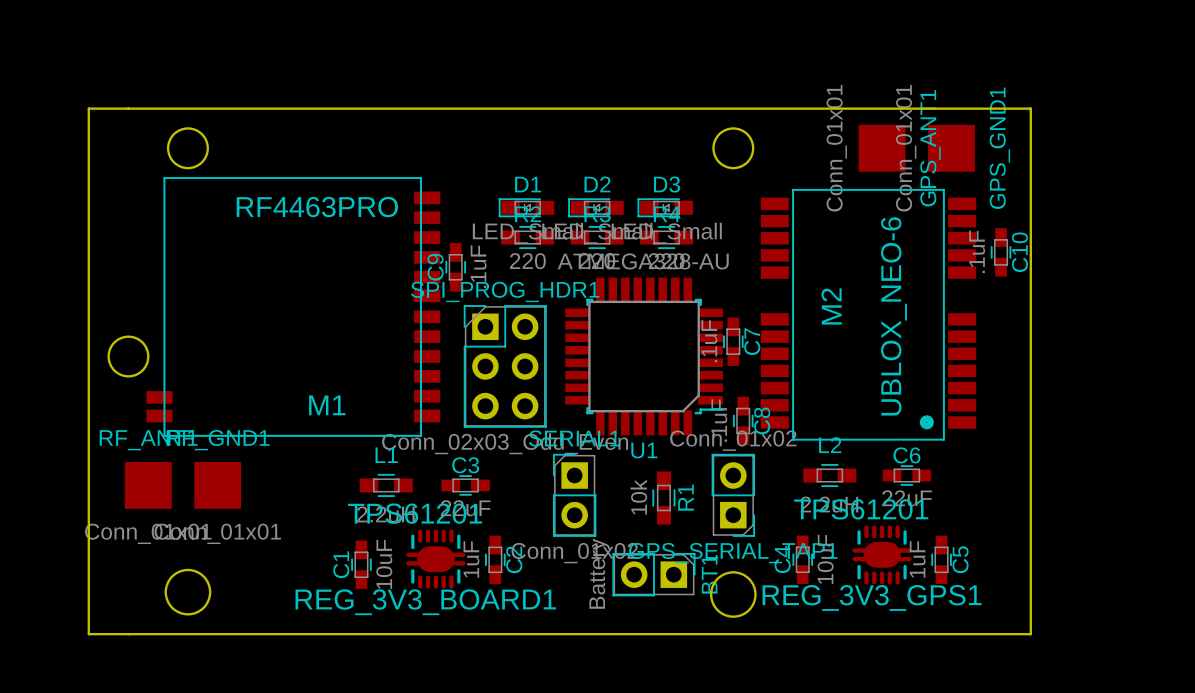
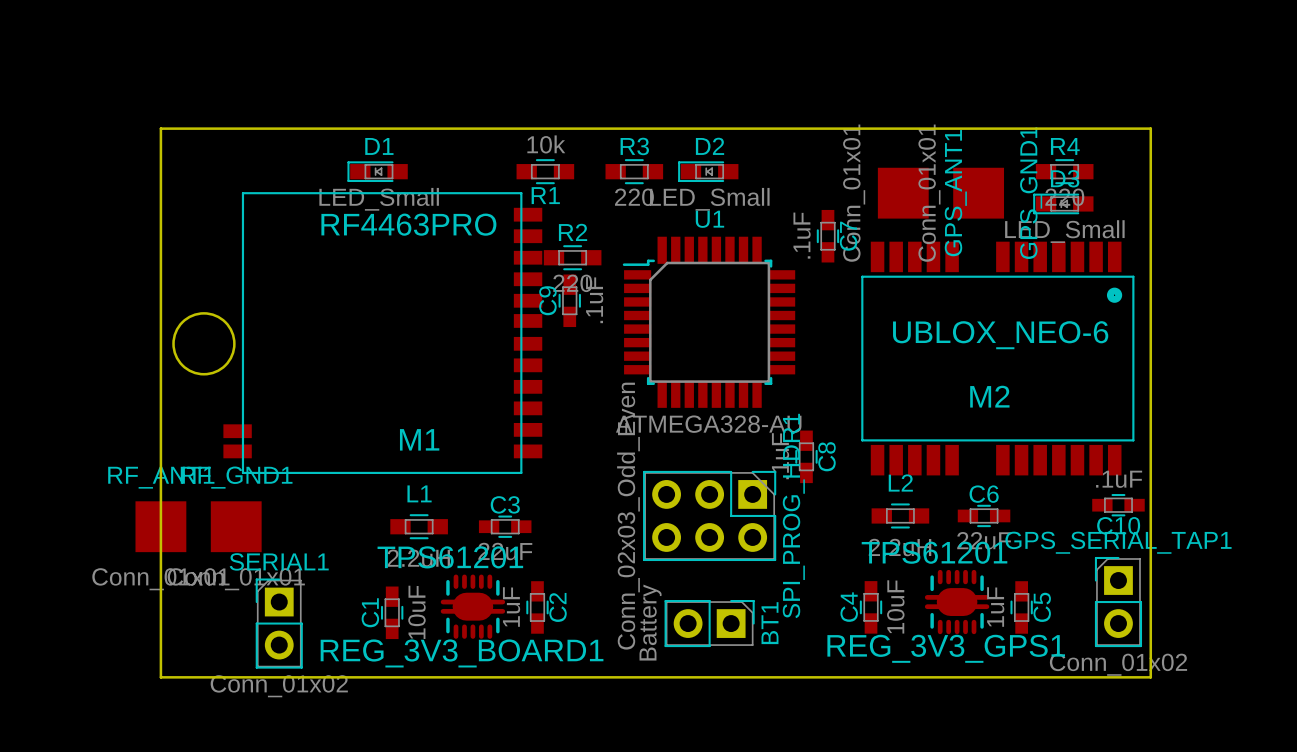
board edge: (88, 108) (1030, 108) (1030, 634) (88, 634) (88, 108) -> (160, 128) (160, 677) (1150, 677) (1150, 128) (160, 128)
round board edge: [166, 127, 209, 170] -> none
round board edge: [712, 127, 755, 170] -> none
GPS_ANT1 position: (882, 148) -> (903, 193)
GPS_GND1 position: (951, 148) -> (978, 193)
D1 position: (526, 207) -> (377, 171)
D2 position: (595, 207) -> (708, 171)
D3 position: (665, 207) -> (1063, 203)
R3 position: (597, 237) -> (634, 171)
R4 position: (666, 237) -> (1064, 171)
C10 rotation: 0° (1001, 252) -> 90° clockwise (1118, 505)
C10 position: (1001, 252) -> (1118, 505)
C9 position: (455, 267) -> (569, 300)
round board edge: none -> [172, 312, 236, 376]
M1 position: (293, 306) -> (382, 333)
M2 rotation: 0° (868, 314) -> 90° counterclockwise (997, 358)
round board edge: [107, 335, 150, 378] -> none
C7 position: (733, 341) -> (827, 236)
U1 rotation: 0° (644, 356) -> 180° (708, 322)
SPI_PROG_HDR1 rotation: 0° (505, 366) -> 90° clockwise (709, 515)
SPI_PROG_HDR1 position: (505, 366) -> (709, 515)
SERIAL1 position: (574, 495) -> (279, 623)
GPS_SERIAL_TAP1 rotation: 0° (733, 495) -> 180° (1118, 602)
GPS_SERIAL_TAP1 position: (733, 495) -> (1118, 602)
R1 rotation: 0° (663, 498) -> 90° clockwise (545, 171)
R1 position: (663, 498) -> (545, 171)
round board edge: [164, 568, 212, 616] -> none
round board edge: [709, 571, 757, 618] -> none

